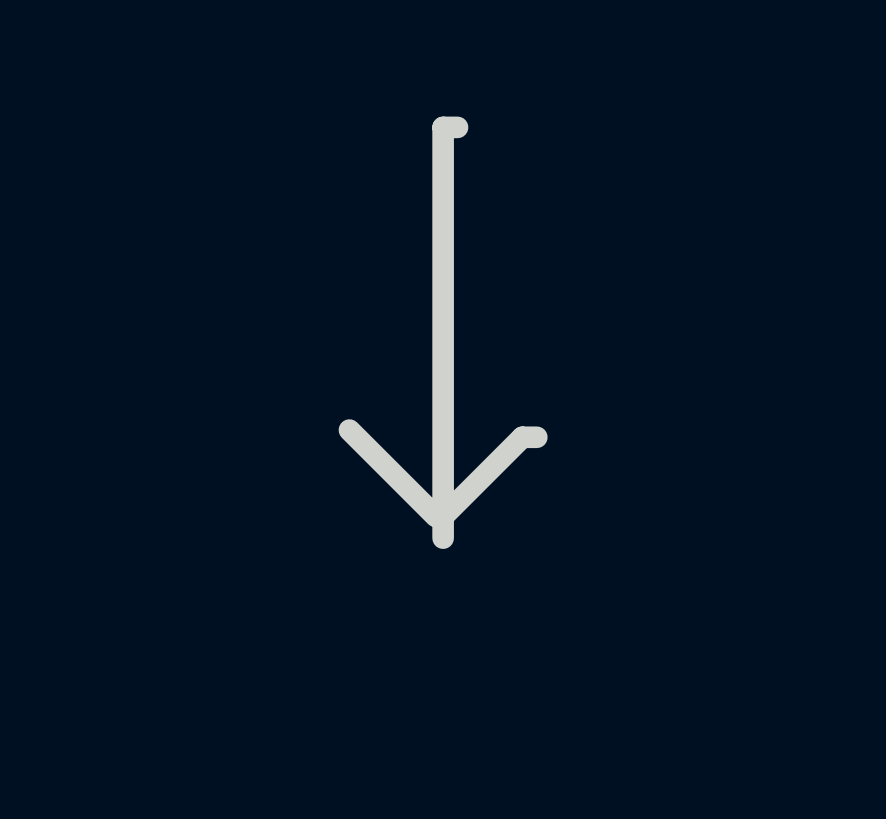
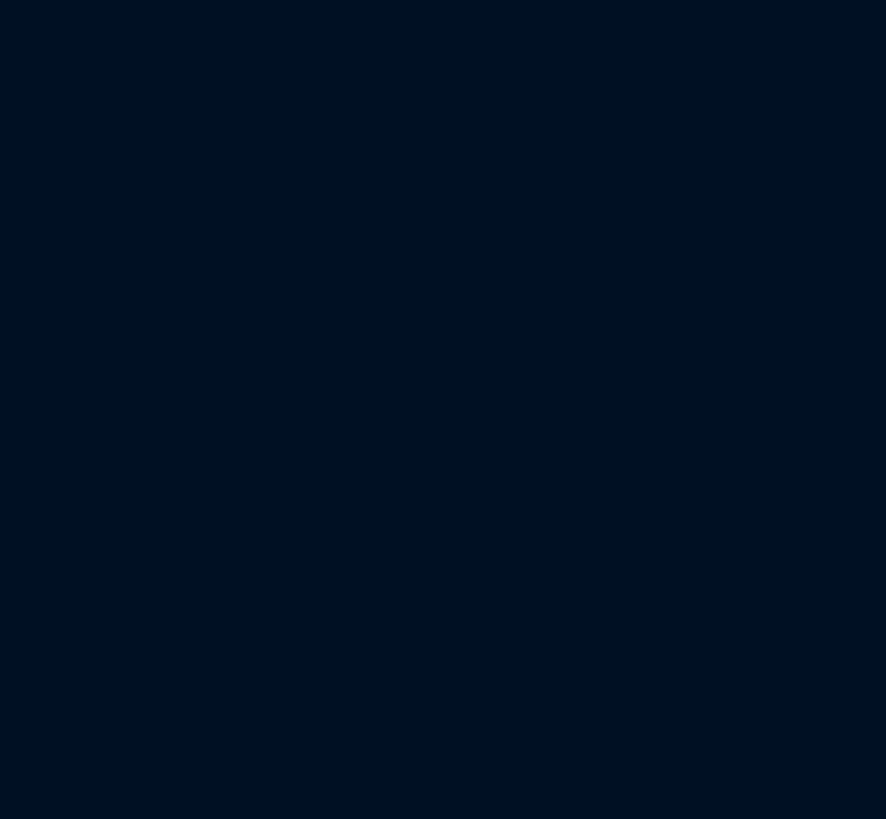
board edge: (457, 127) (443, 127) (443, 538) -> none
board edge: (349, 430) (435, 516) -> none
board edge: (536, 437) (522, 437) (443, 516) -> none

